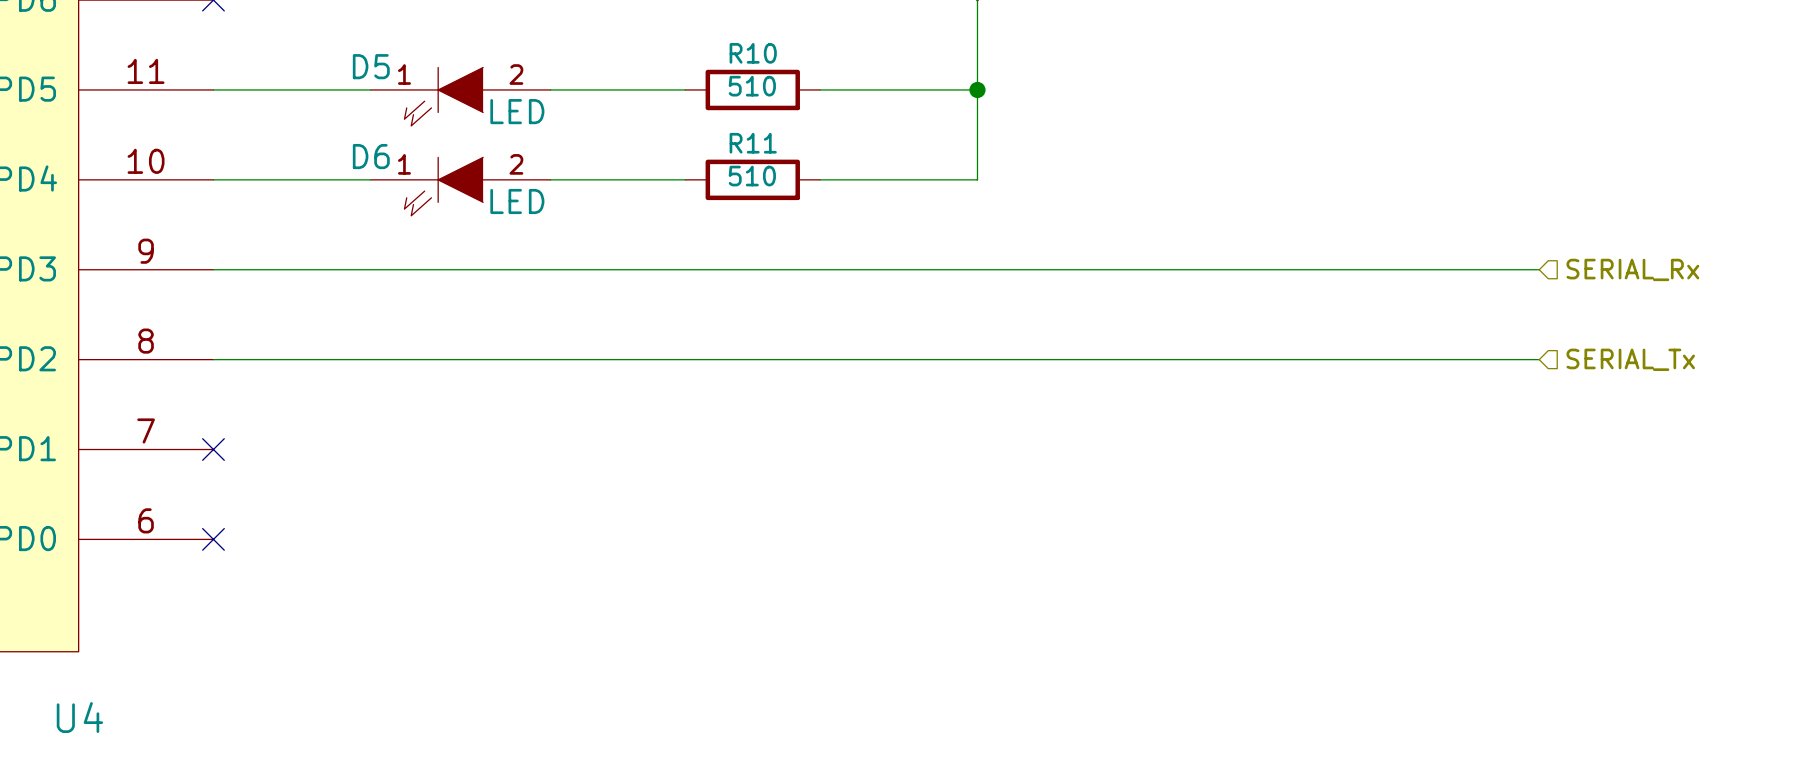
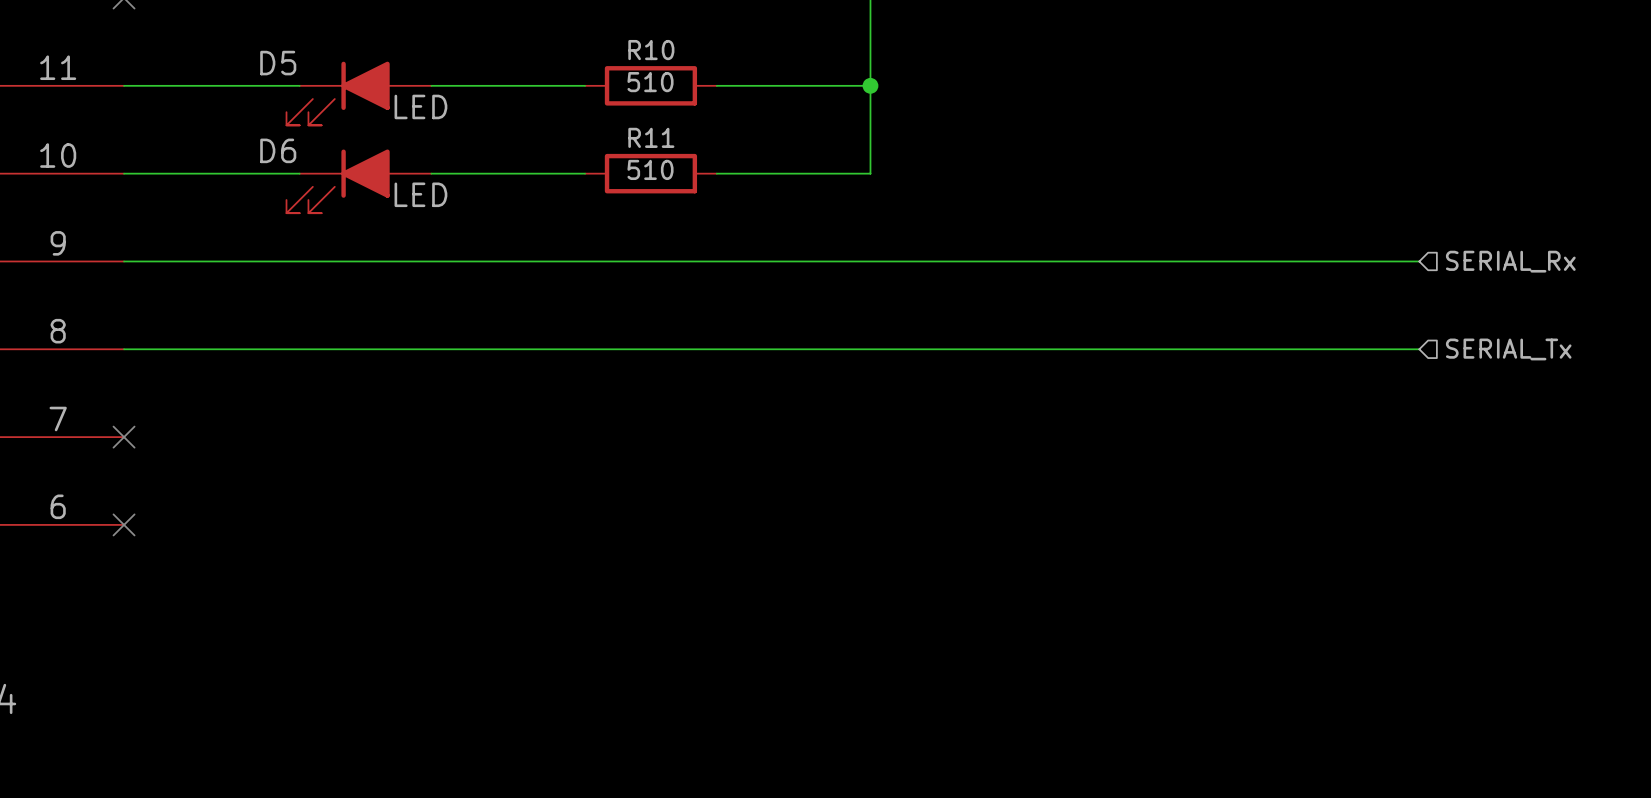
D5 symbol: [370, 67, 551, 126] -> [286, 61, 432, 126]
D6 symbol: [370, 157, 551, 216] -> [286, 149, 432, 214]

